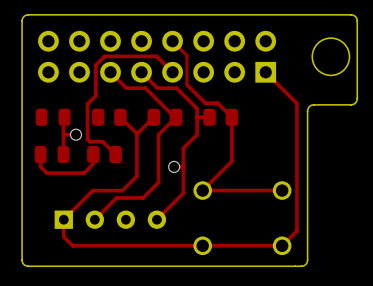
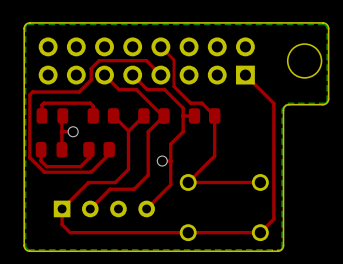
bottom zone outline: none -> (324, 24) (327, 27) (327, 101) (287, 103) (282, 108) (280, 249) (28, 249) (25, 247) (27, 24) (324, 24)
top track: (95, 77) (95, 95) (87, 103) (87, 139) (89, 141) (102, 141) (115, 154) -> (91, 79) (79, 91) (32, 91) (29, 94) (29, 157) (44, 172) (91, 172) (113, 149)
top track: none -> (93, 115) (93, 106) (90, 103) (43, 103) (41, 105) (41, 115)

